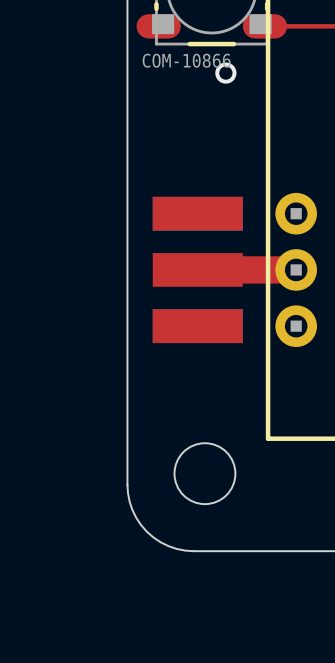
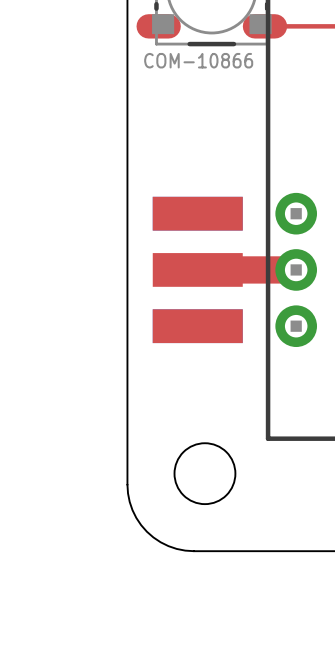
via: (225, 73) -> none

